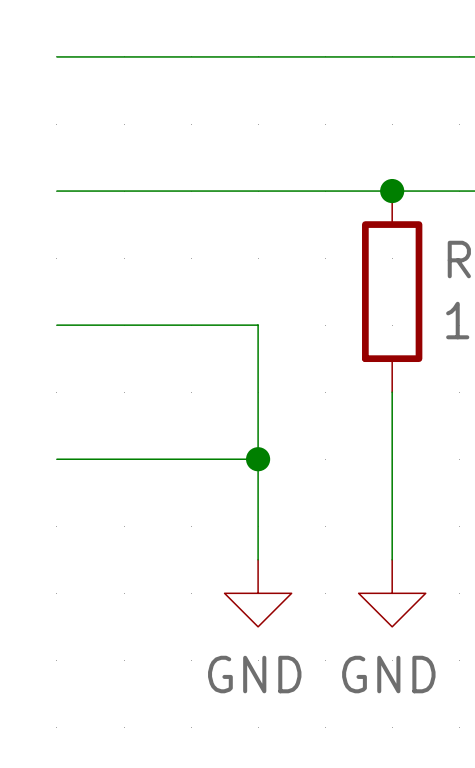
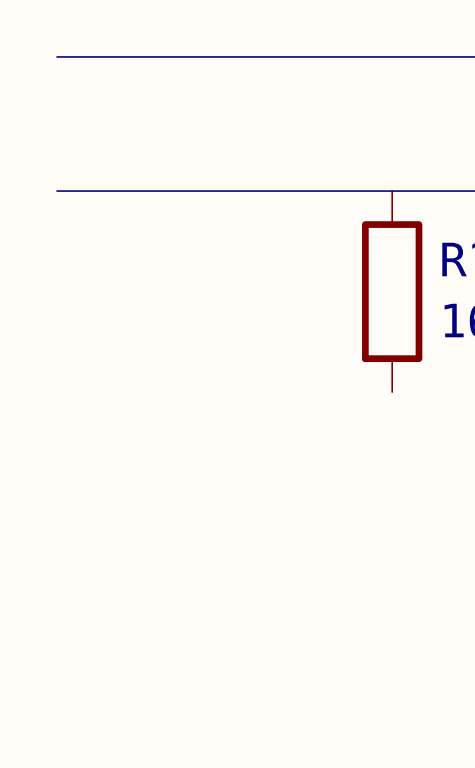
junction: (392, 191) -> none
wire: (56, 325) (258, 325) (258, 559) -> none
wire: (392, 392) (392, 559) -> none
wire: (56, 459) (258, 459) -> none
junction: (258, 459) -> none
power symbol: GND (258, 593) -> none
power symbol: GND (392, 593) -> none

